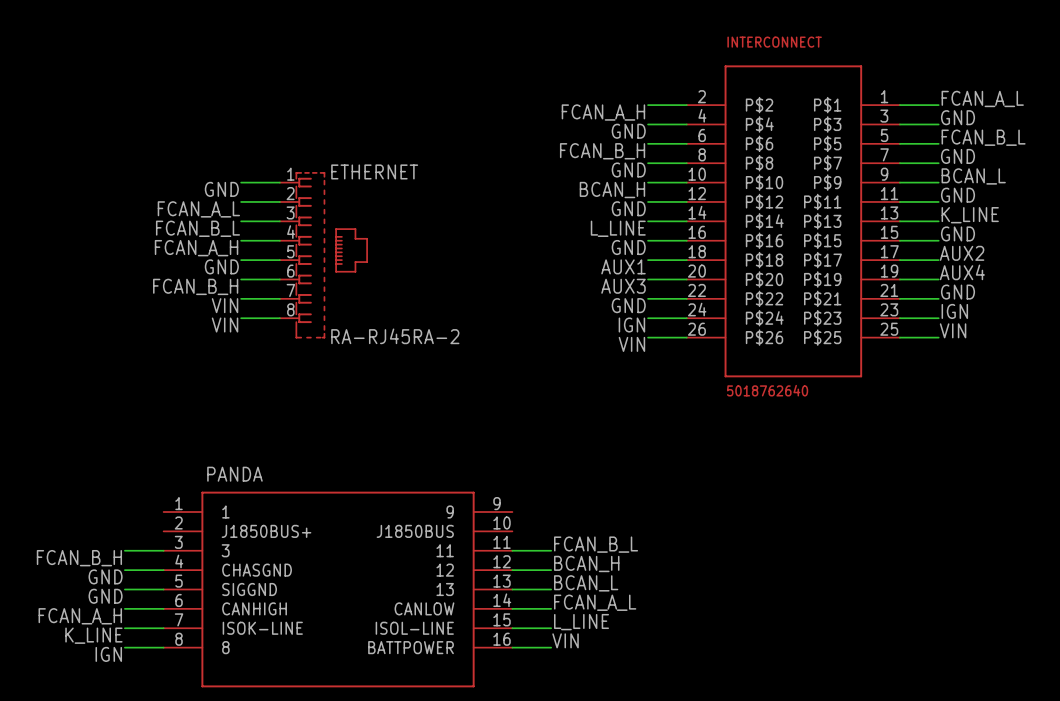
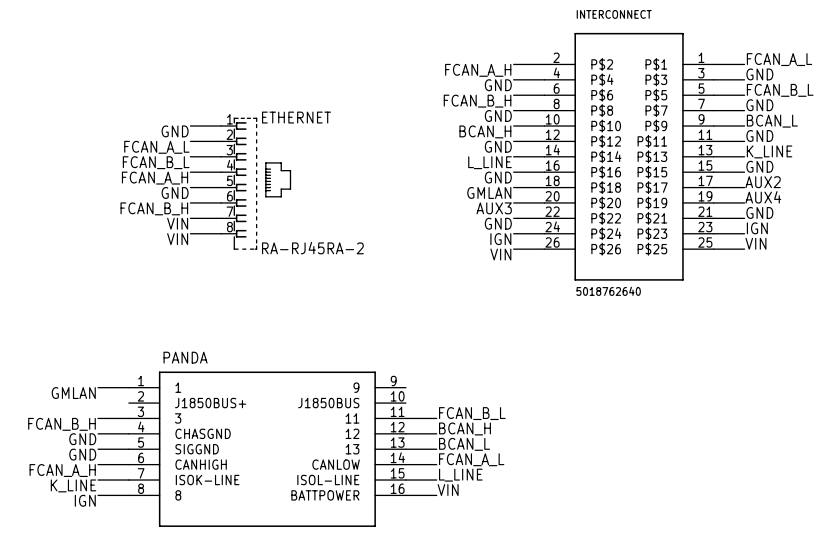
label: AUX1 (623, 266) -> GMLAN (489, 192)
wire: none -> (98, 387) (128, 387)
label: none -> GMLAN (73, 393)

